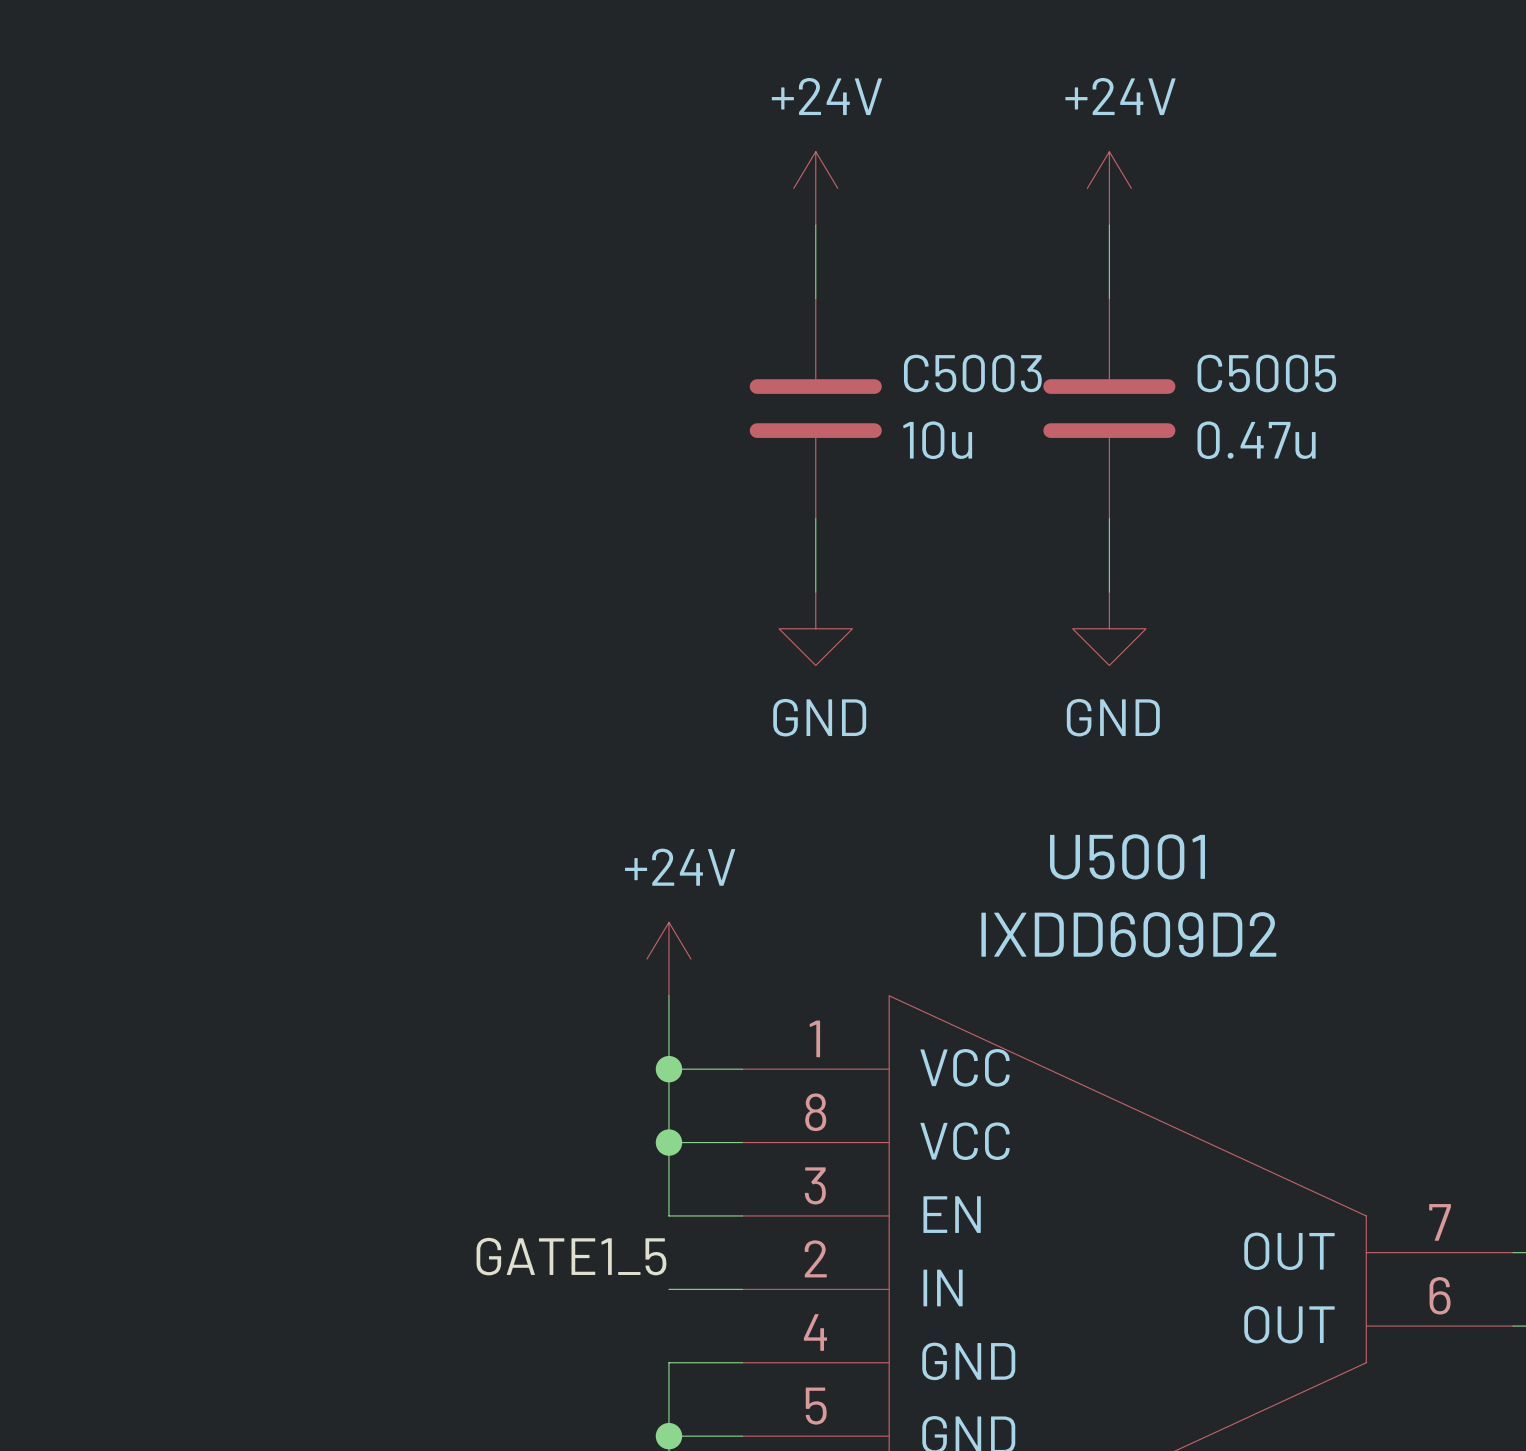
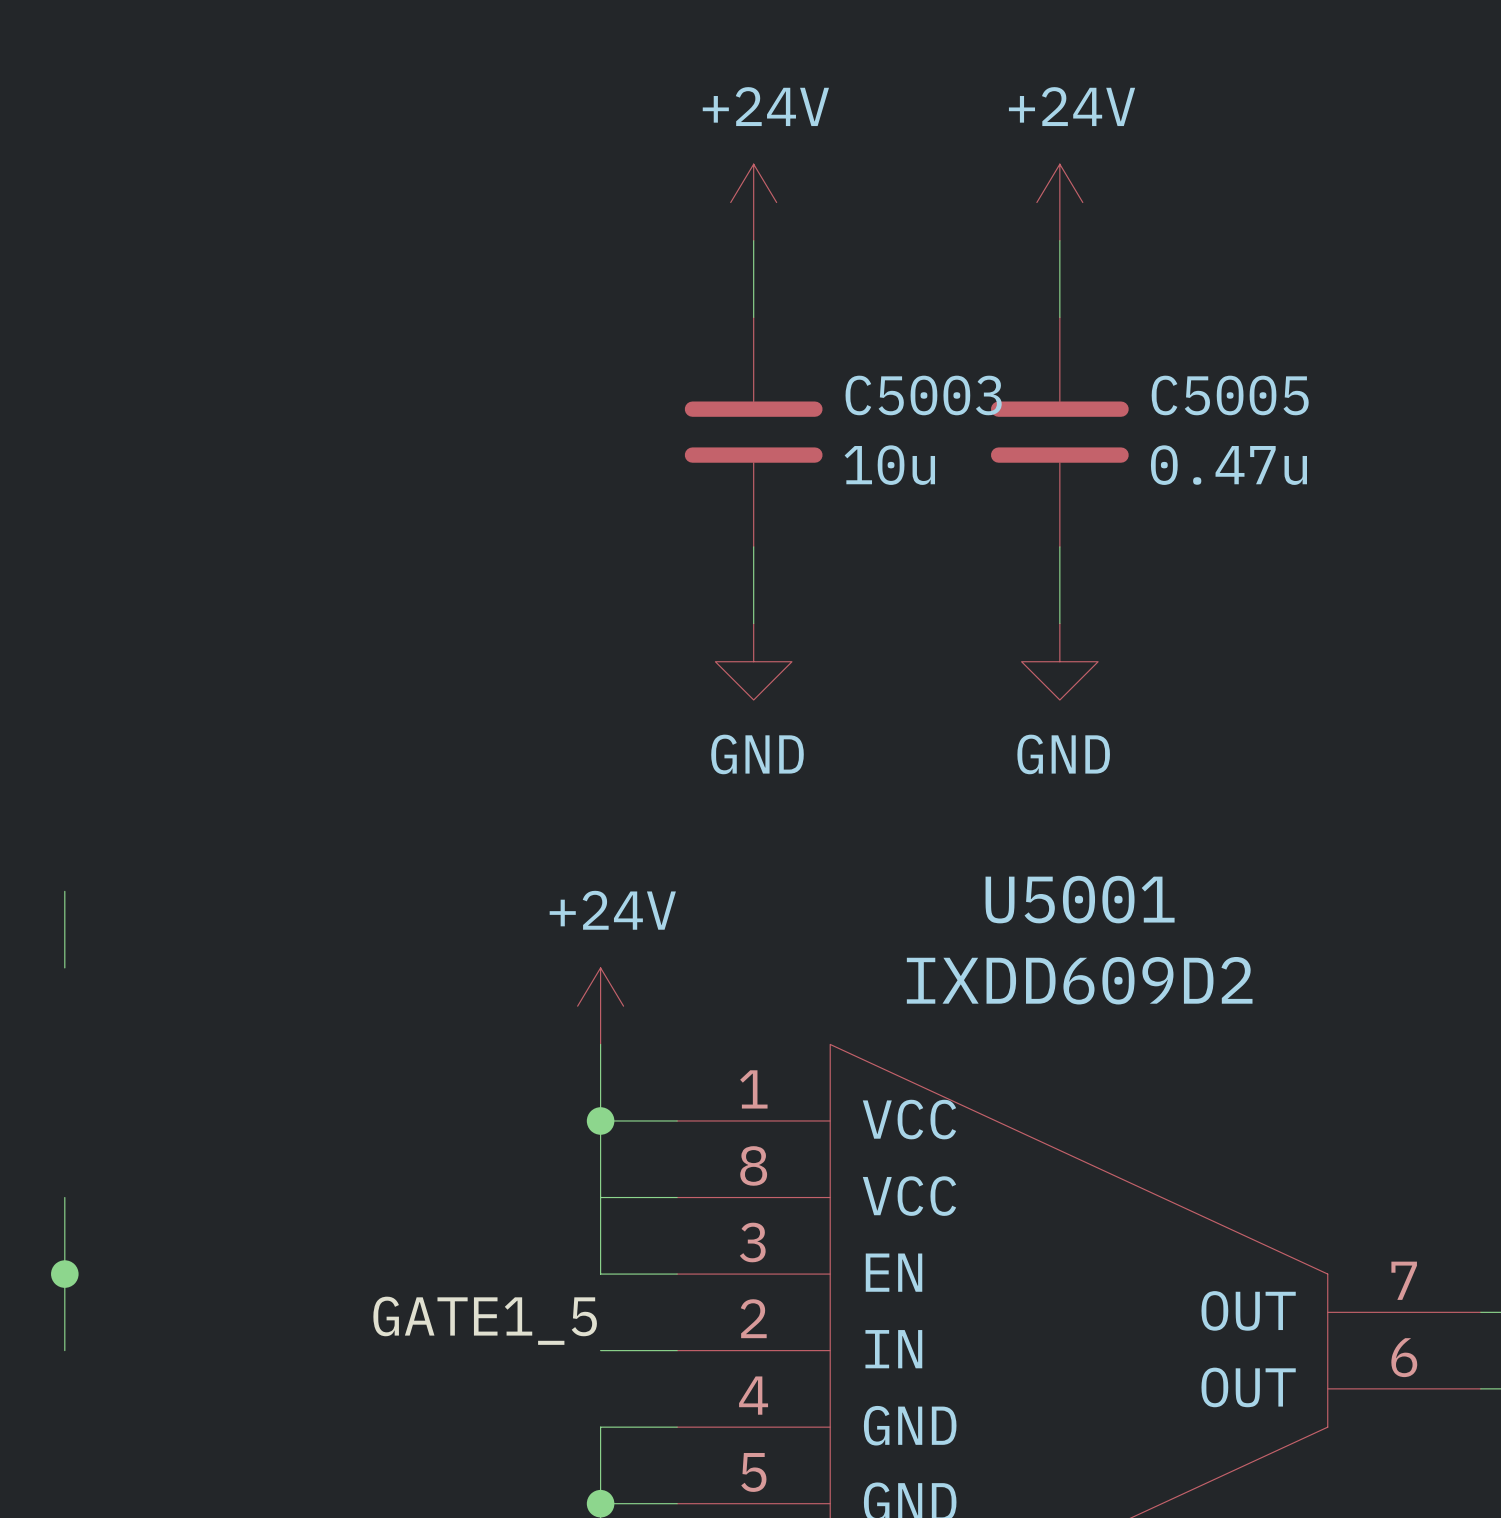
wire: none -> (64, 891) (64, 967)
wire: none -> (64, 1197) (64, 1350)
junction: (668, 1142) -> none
junction: none -> (64, 1274)

